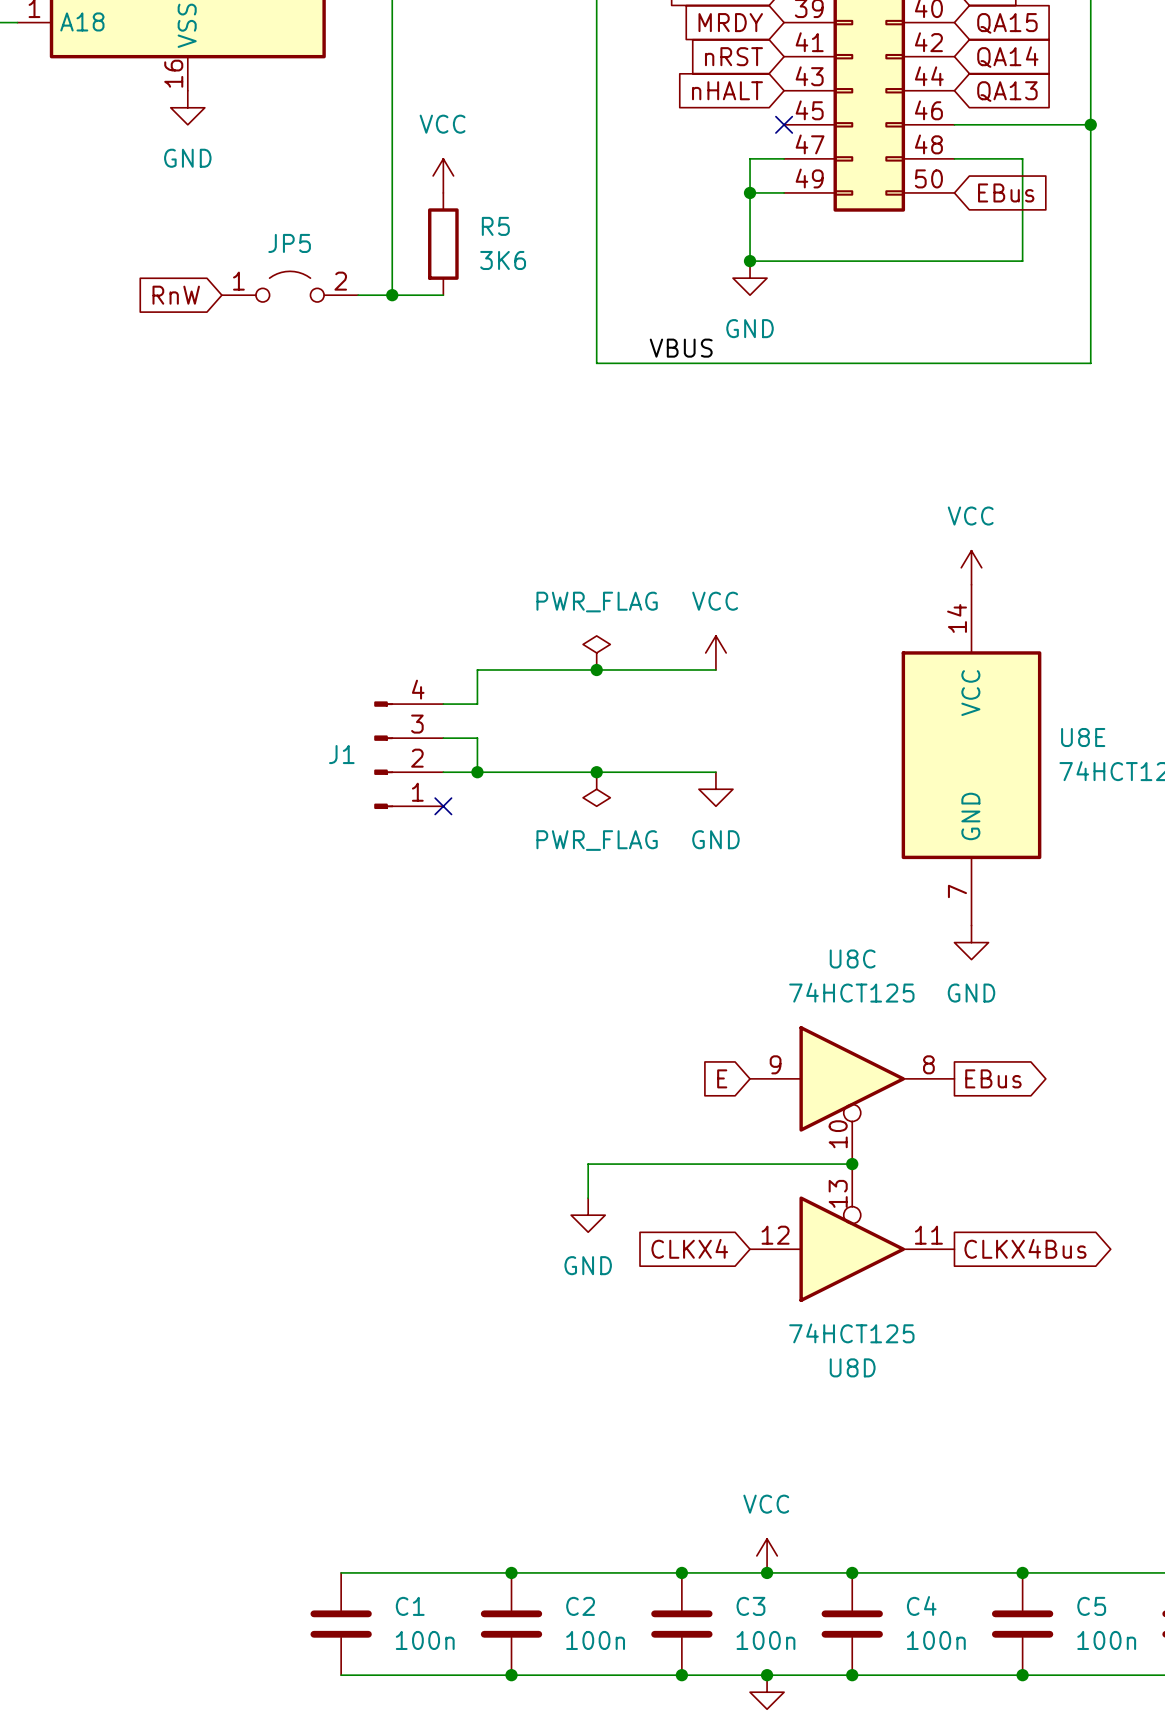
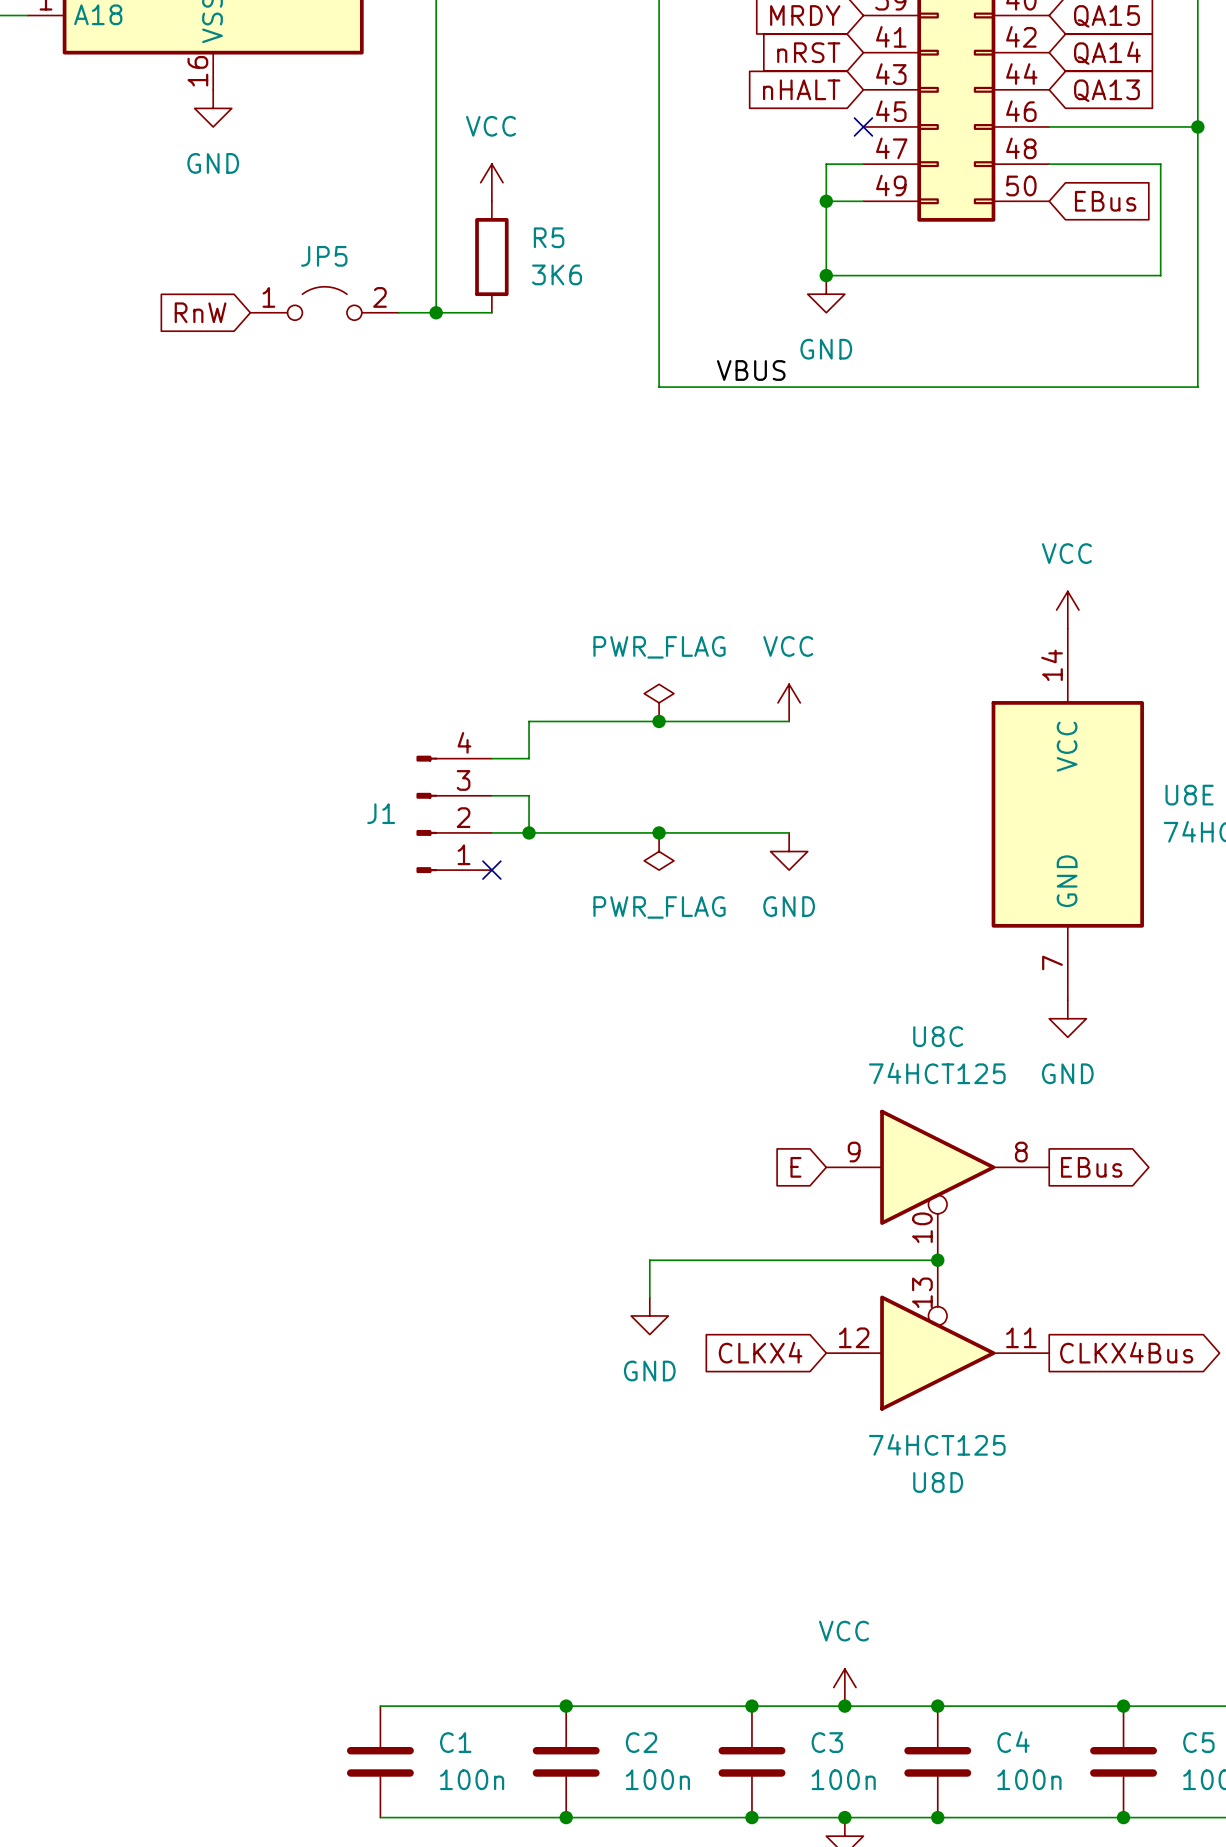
wire: (1022, 158) (1022, 261) -> (1123, 164) (1160, 164) (1160, 275) (1123, 275)

